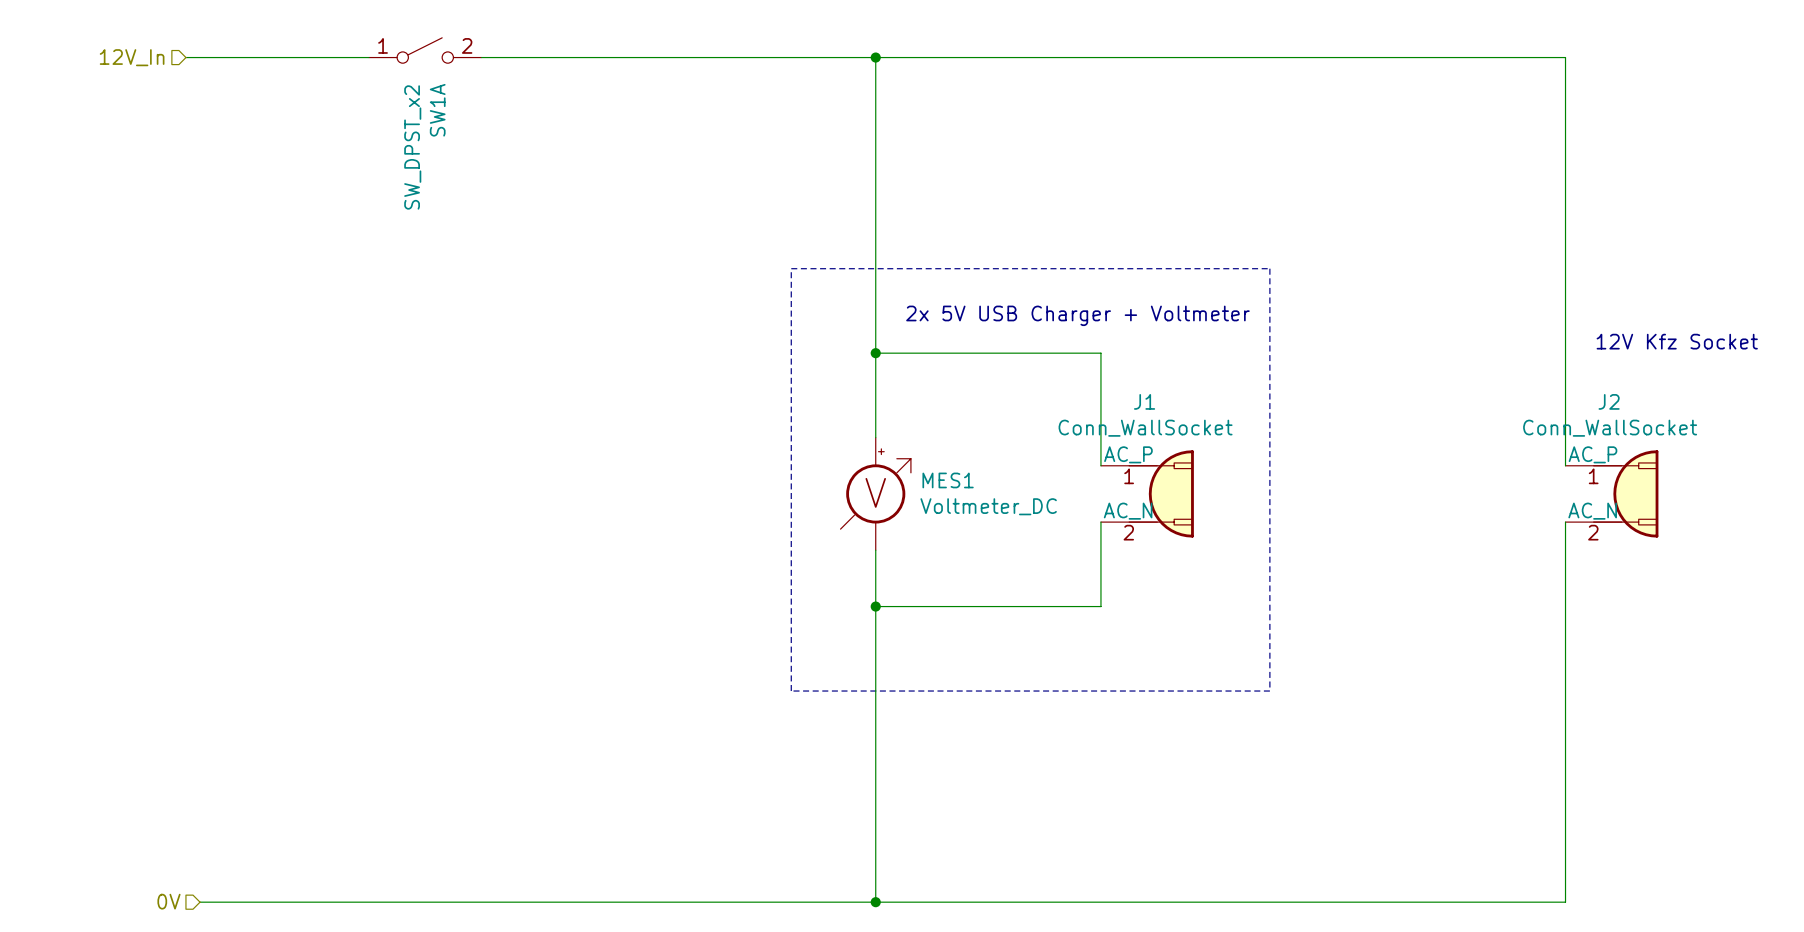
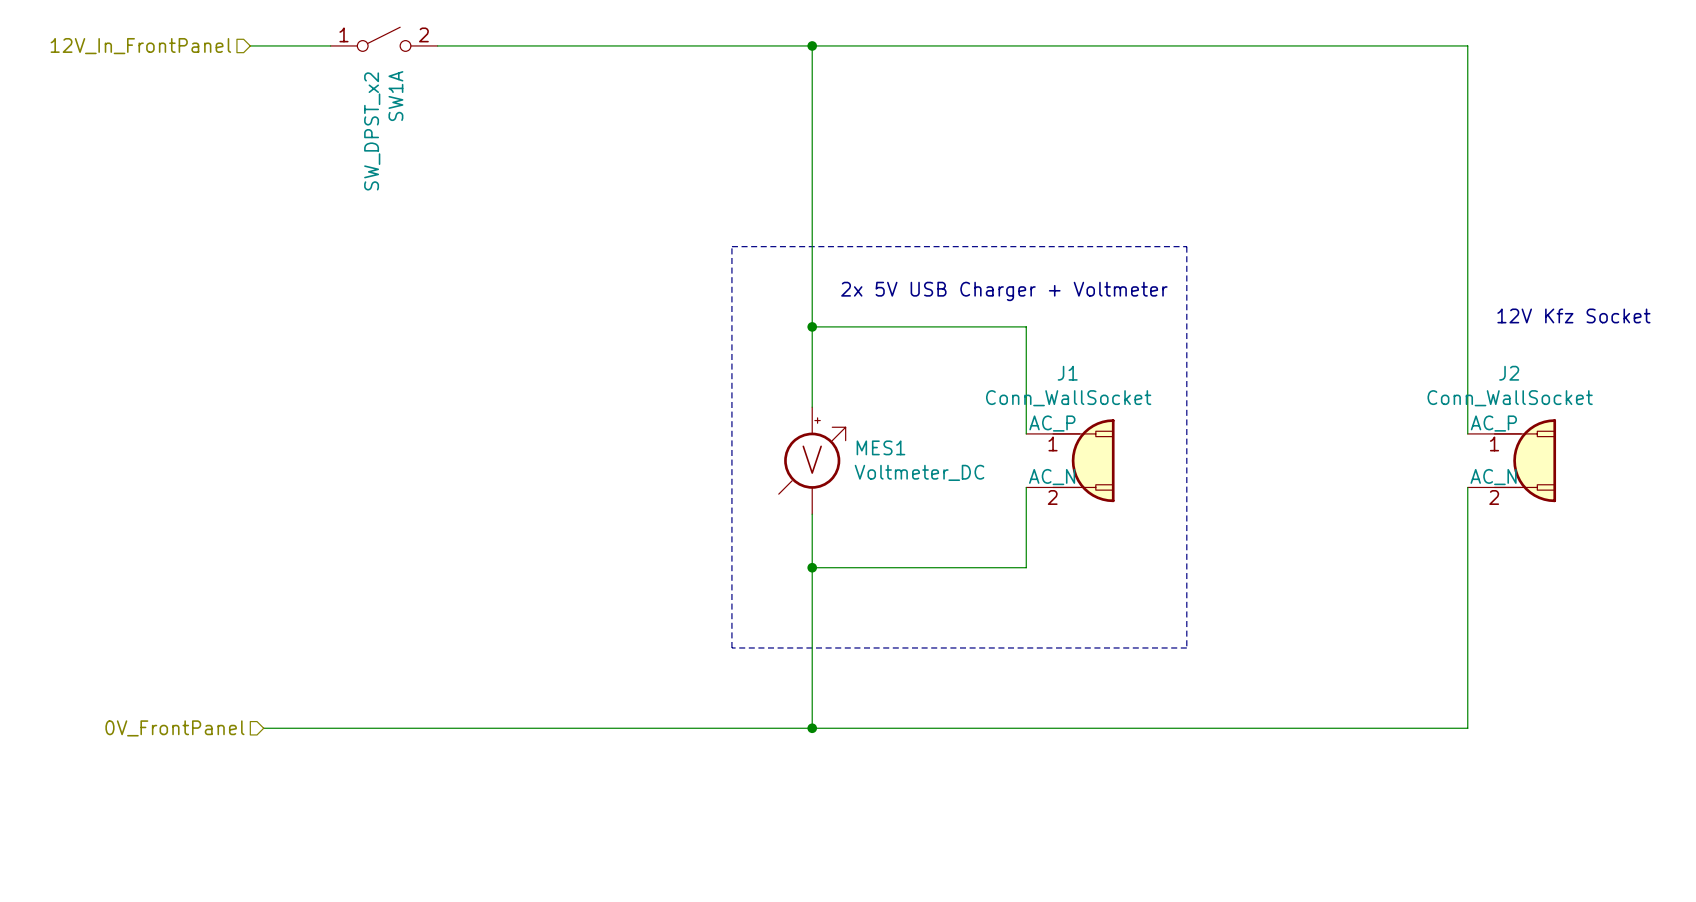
hierarchical label: 12V_In (132, 57) -> none
hierarchical label: none -> 12V_In_FrontPanel (140, 46)
wire: (185, 57) (284, 57) -> none
hierarchical label: none -> 0V_FrontPanel (174, 728)
wire: (875, 775) (875, 902) -> none
junction: none -> (812, 728)
wire: (1565, 775) (1565, 902) (200, 902) -> (1467, 728) (263, 728)
hierarchical label: 0V (168, 901) -> none
junction: (875, 902) -> none

